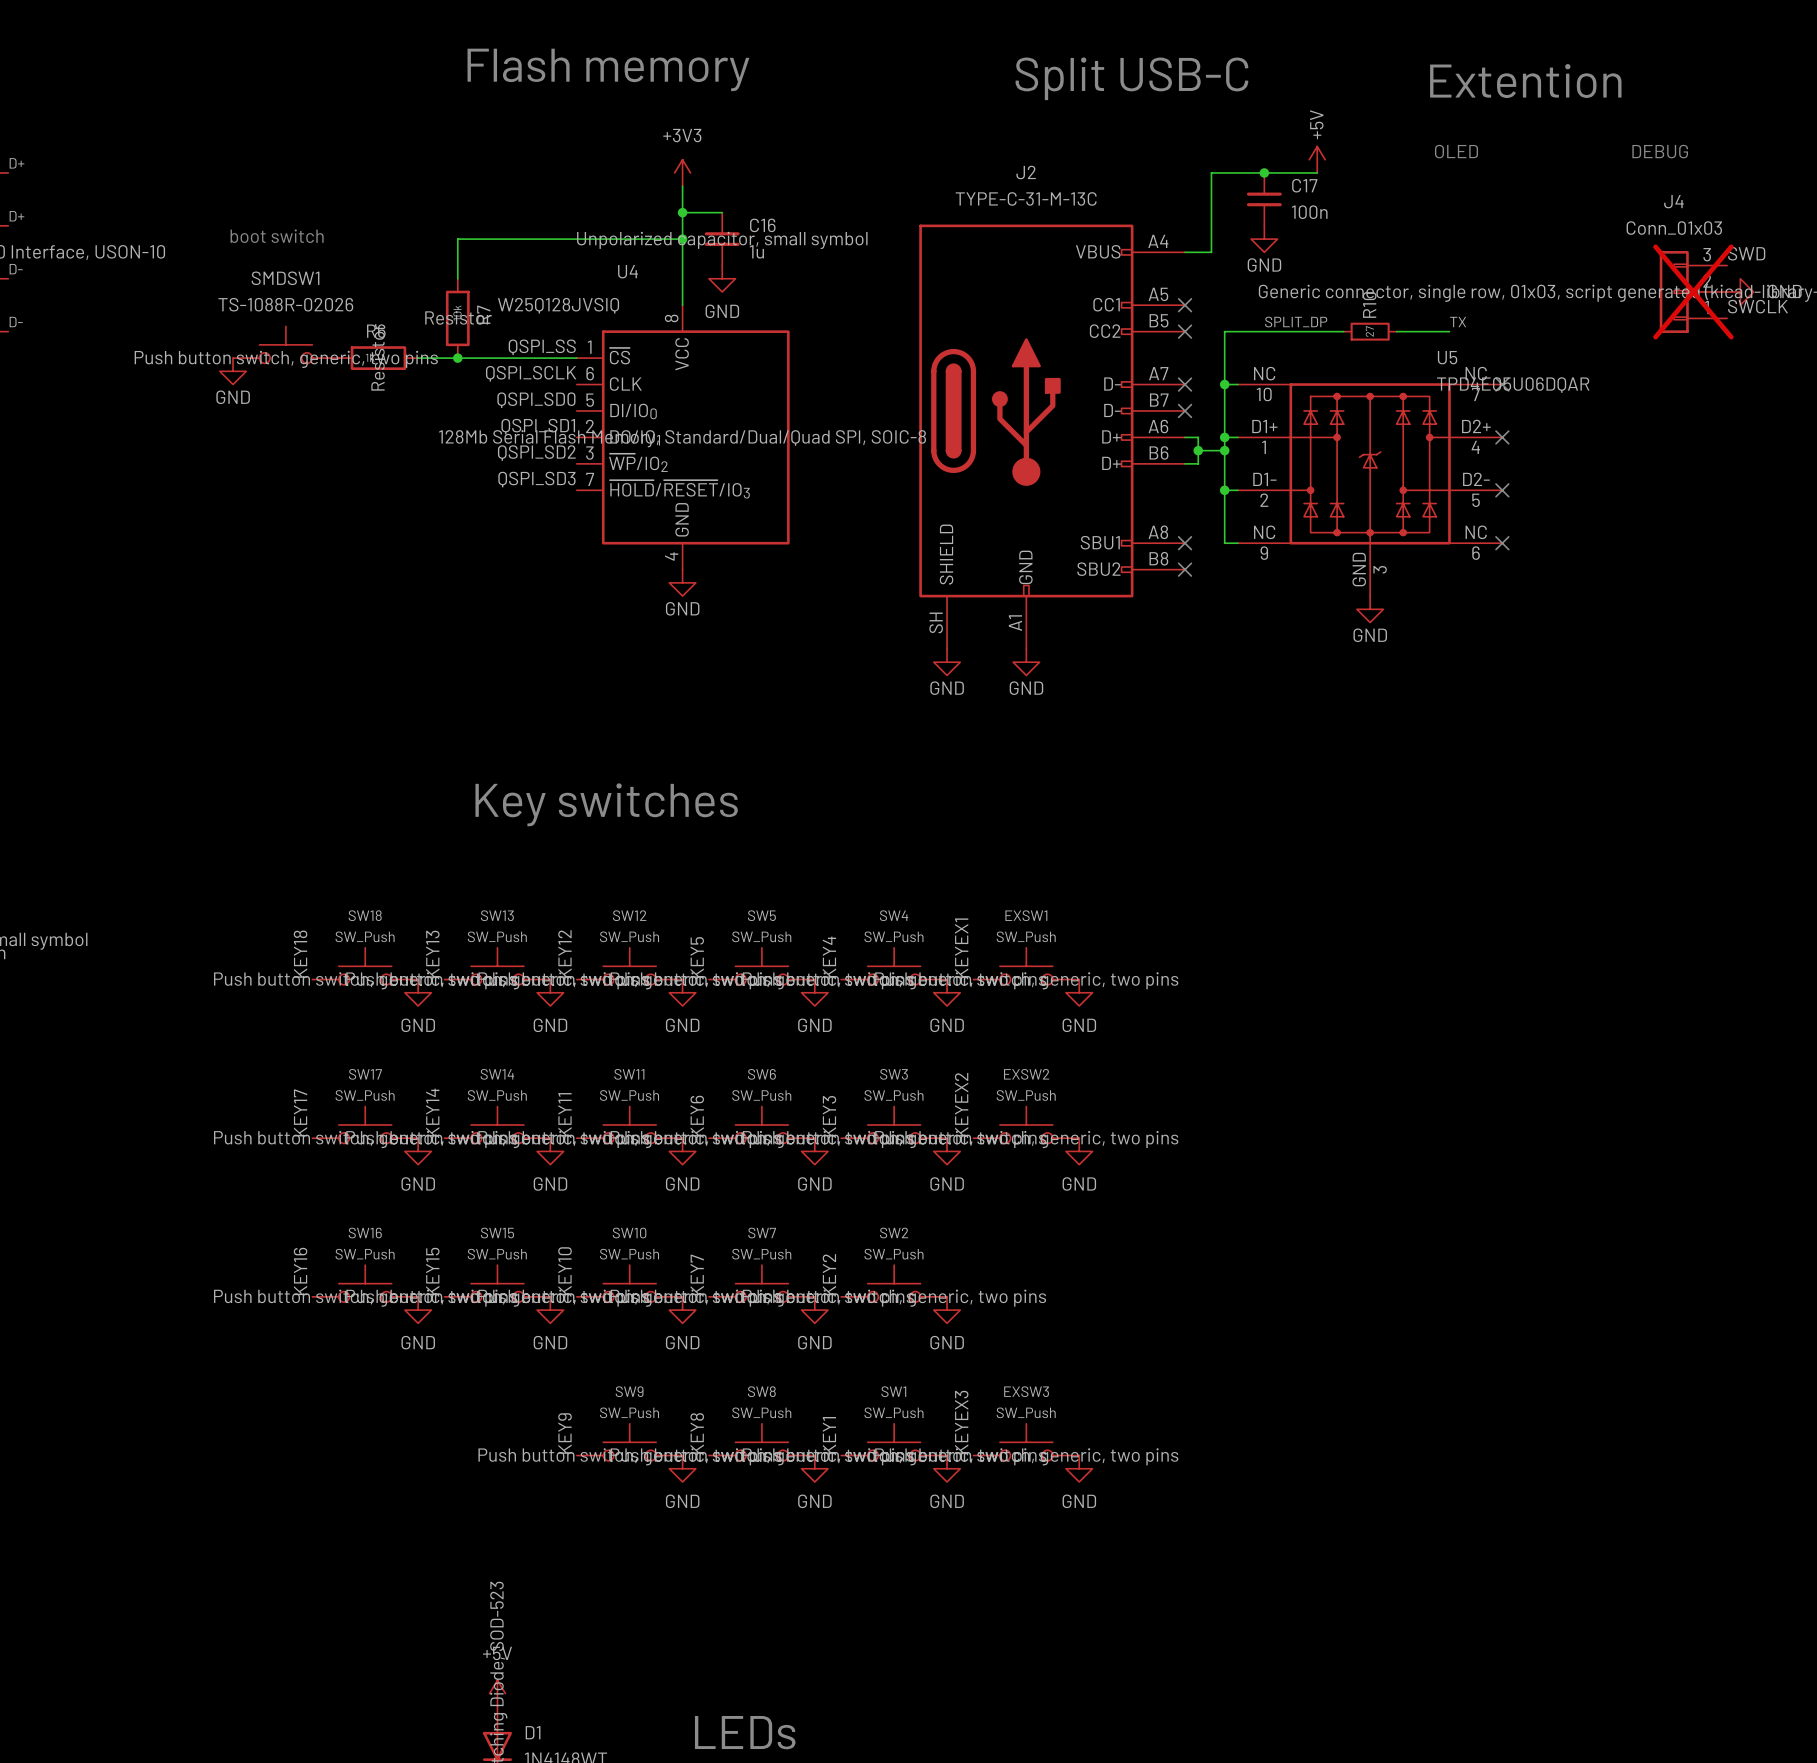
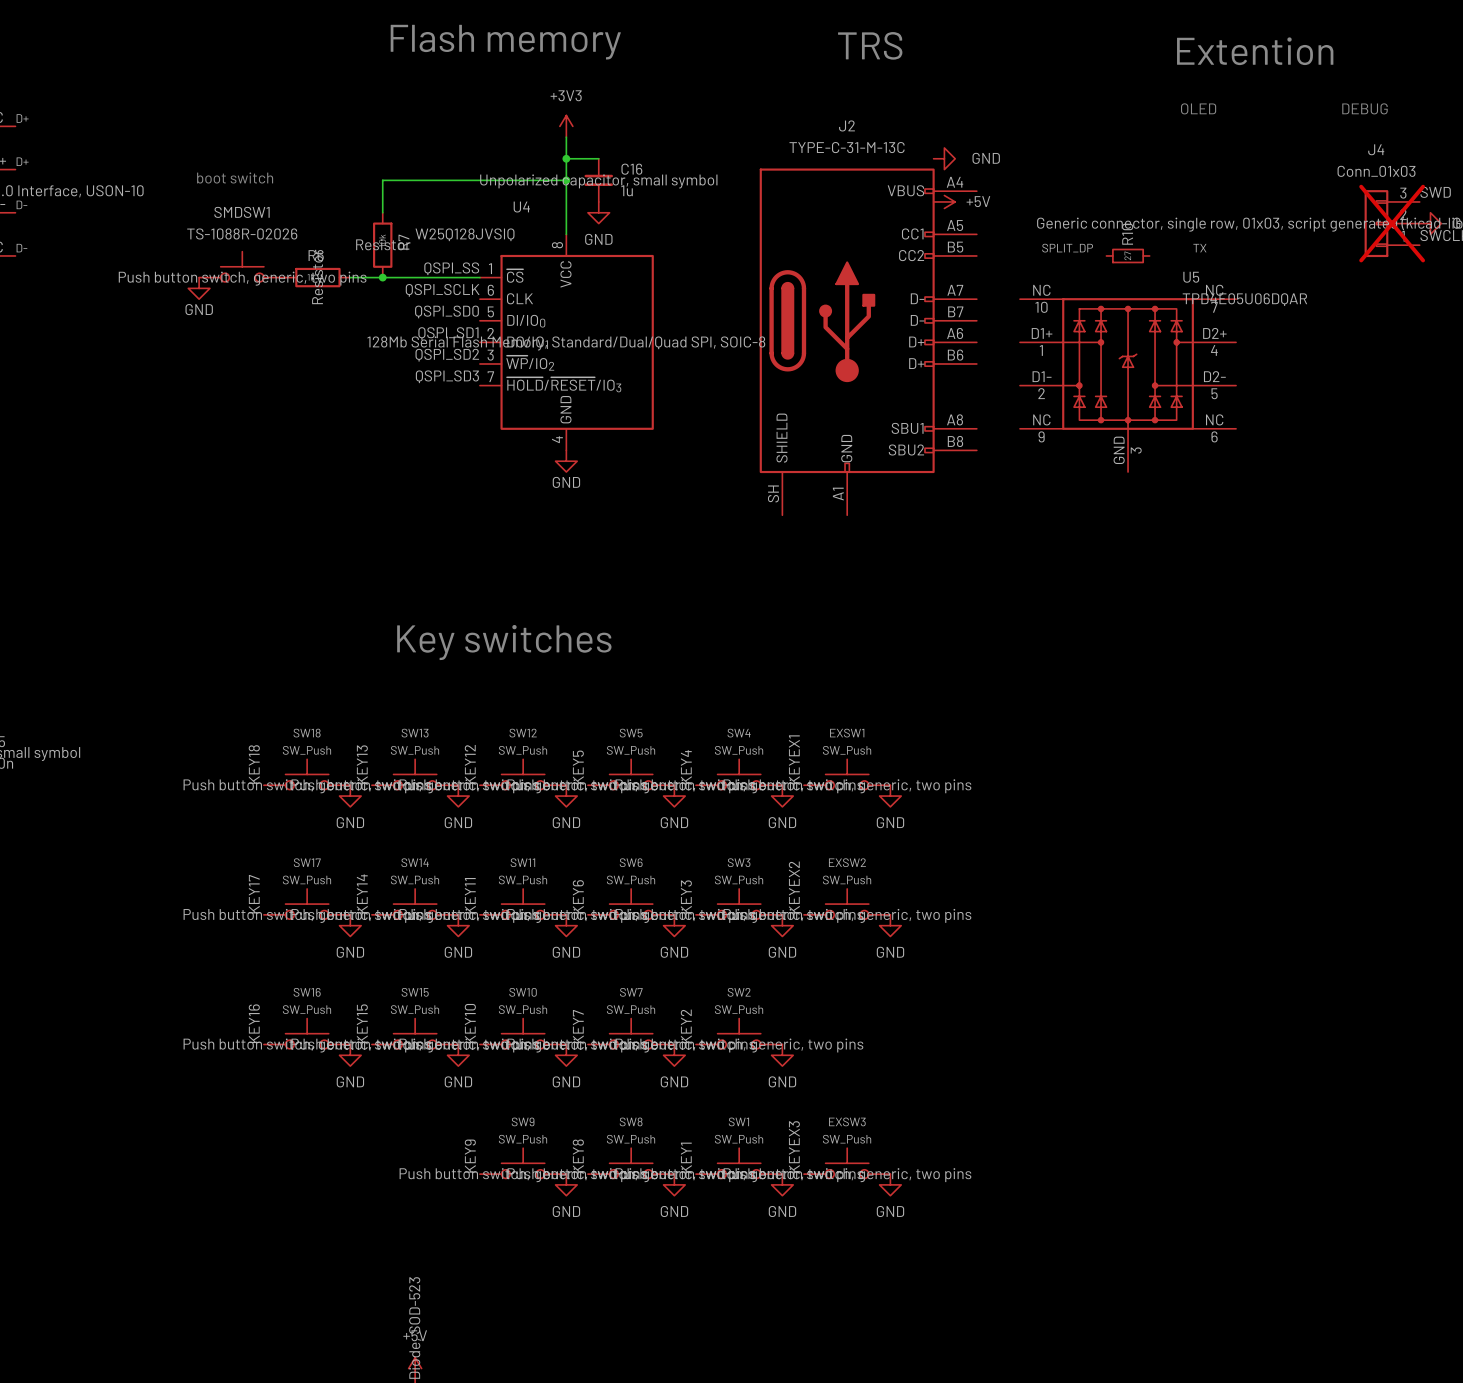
text: Split USB-C (1131, 78) -> TRS (870, 45)
power symbol rotation: 0° (1317, 159) -> 90° clockwise (944, 201)
power symbol position: +5V (1317, 159) -> +5V (944, 201)
junction: (1264, 172) -> none
wire: (1317, 172) (1211, 172) (1211, 252) (1185, 252) -> none
C17: 100n (1264, 199) -> none
power symbol rotation: 0° (1264, 239) -> 90° counterclockwise (944, 158)
power symbol position: GND (1264, 239) -> GND (944, 158)
power symbol text position: GND (1264, 265) -> GND (986, 158)
no-connect mark: (1185, 305) -> none
no-connect mark: (1185, 331) -> none
wire: (1343, 331) (1224, 331) (1224, 543) (1237, 543) -> none
wire: (1396, 331) (1449, 331) -> none
no-connect mark: (1185, 384) -> none
wire: (1224, 384) (1237, 384) -> none
junction: (1224, 384) -> none
no-connect mark: (1502, 384) -> none
no-connect mark: (1185, 410) -> none
wire: (1185, 437) (1198, 437) (1198, 463) (1185, 463) -> none
wire: (1224, 437) (1237, 437) -> none
junction: (1224, 437) -> none
no-connect mark: (1502, 437) -> none
wire: (1198, 450) (1224, 450) -> none
junction: (1198, 450) -> none
junction: (1224, 450) -> none
wire: (1224, 490) (1237, 490) -> none
junction: (1224, 490) -> none
no-connect mark: (1502, 490) -> none
no-connect mark: (1185, 543) -> none
no-connect mark: (1502, 543) -> none
no-connect mark: (1185, 569) -> none
power symbol: GND (1370, 609) -> none
power symbol: GND (947, 662) -> none
power symbol: GND (1026, 662) -> none

